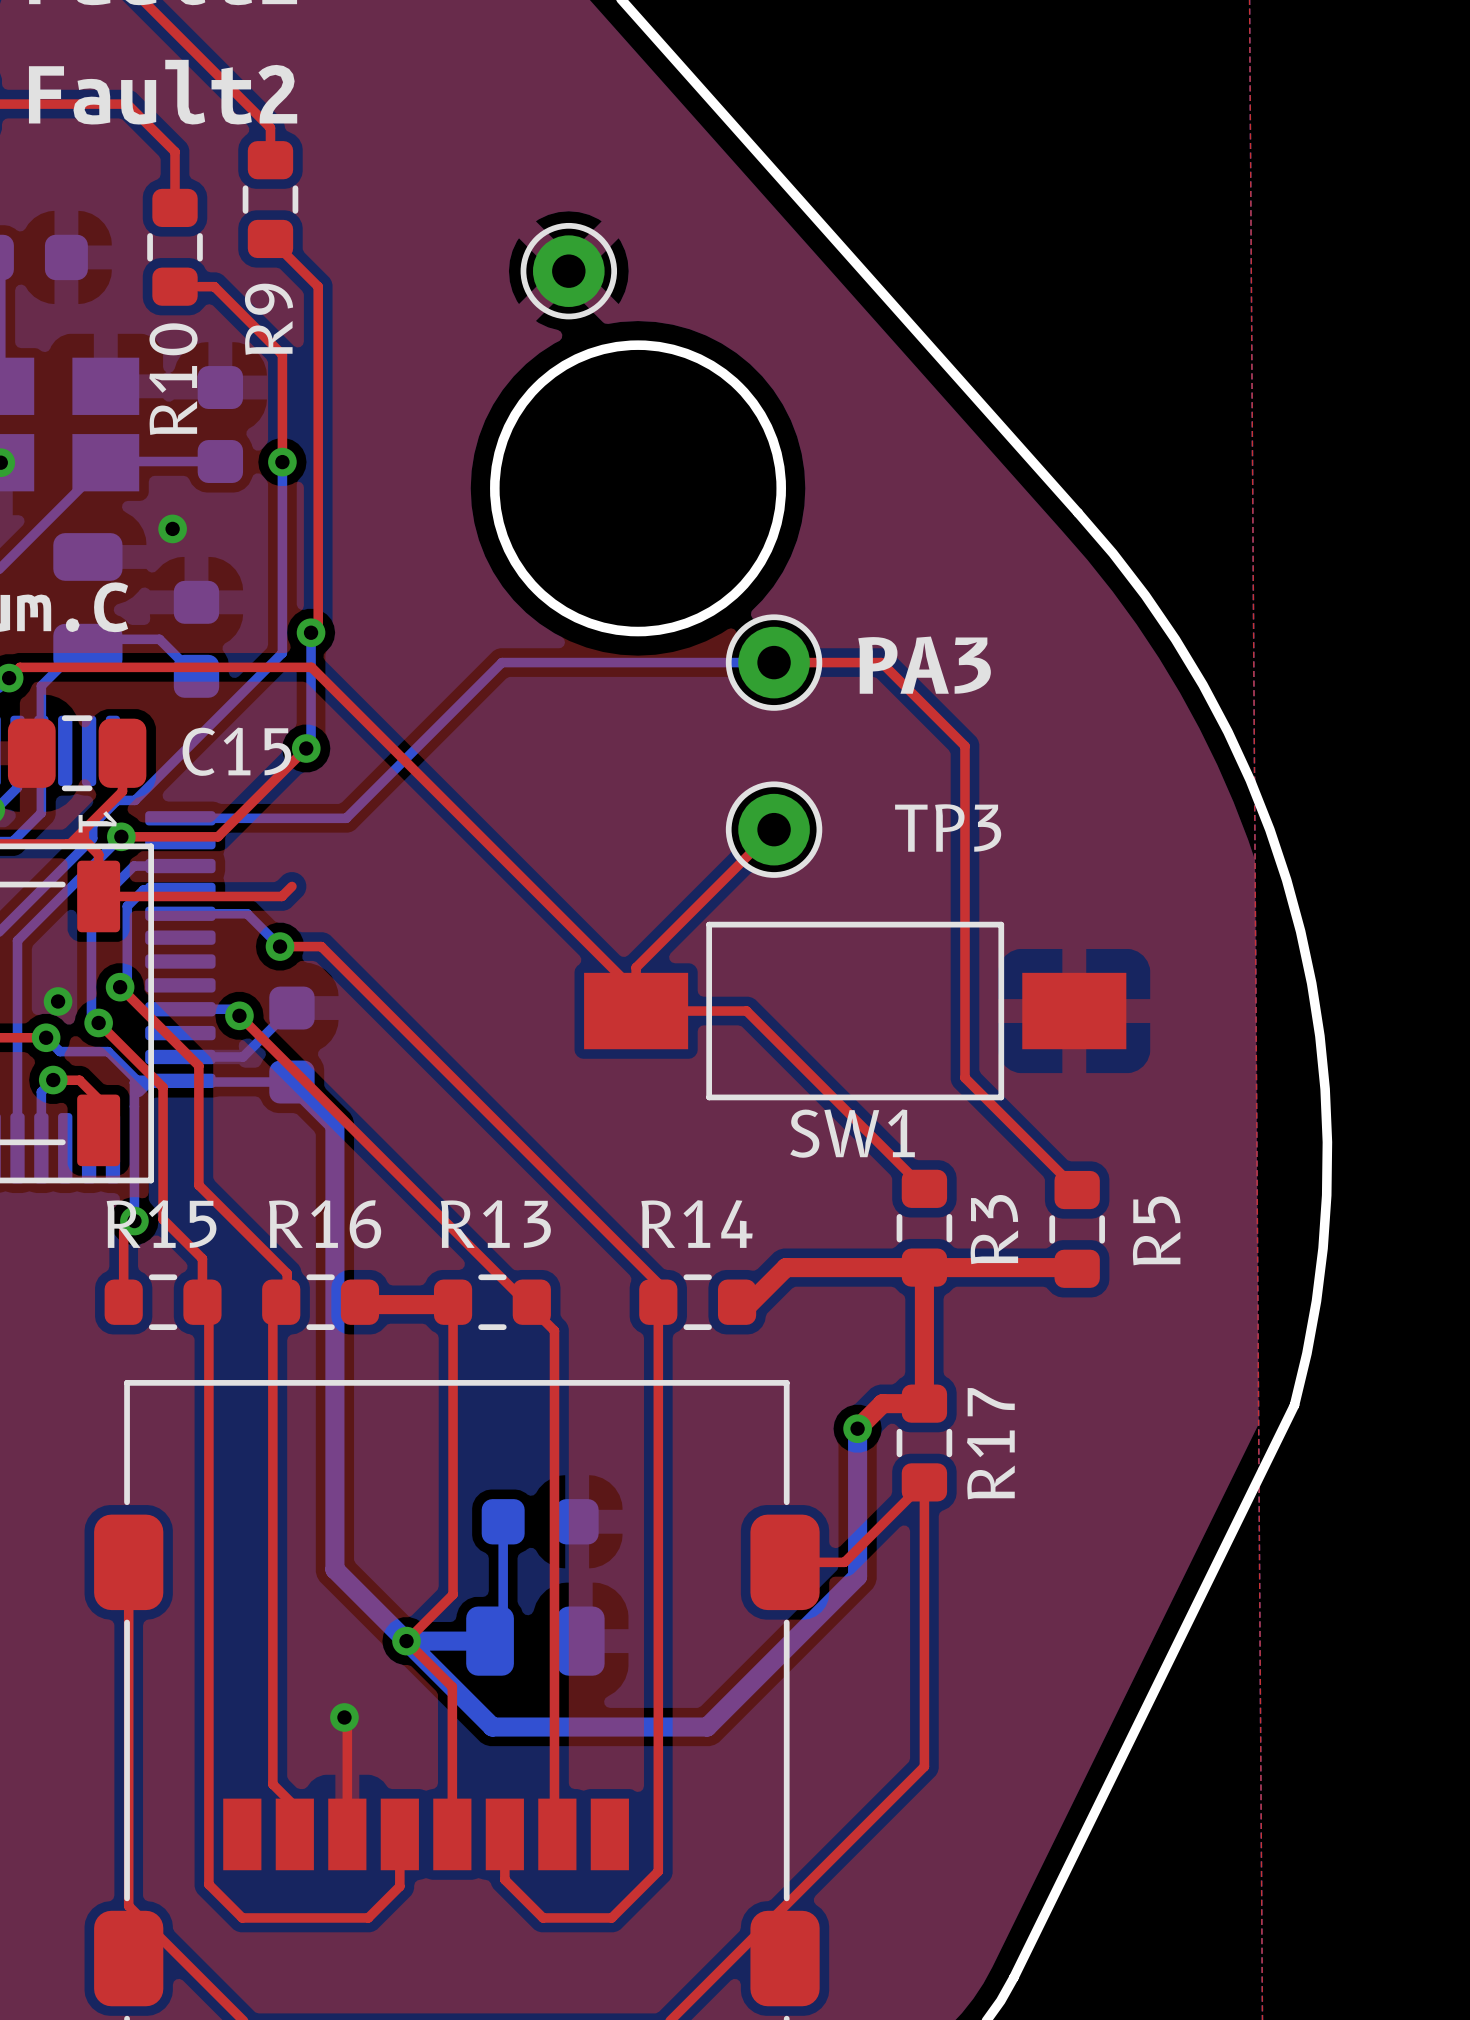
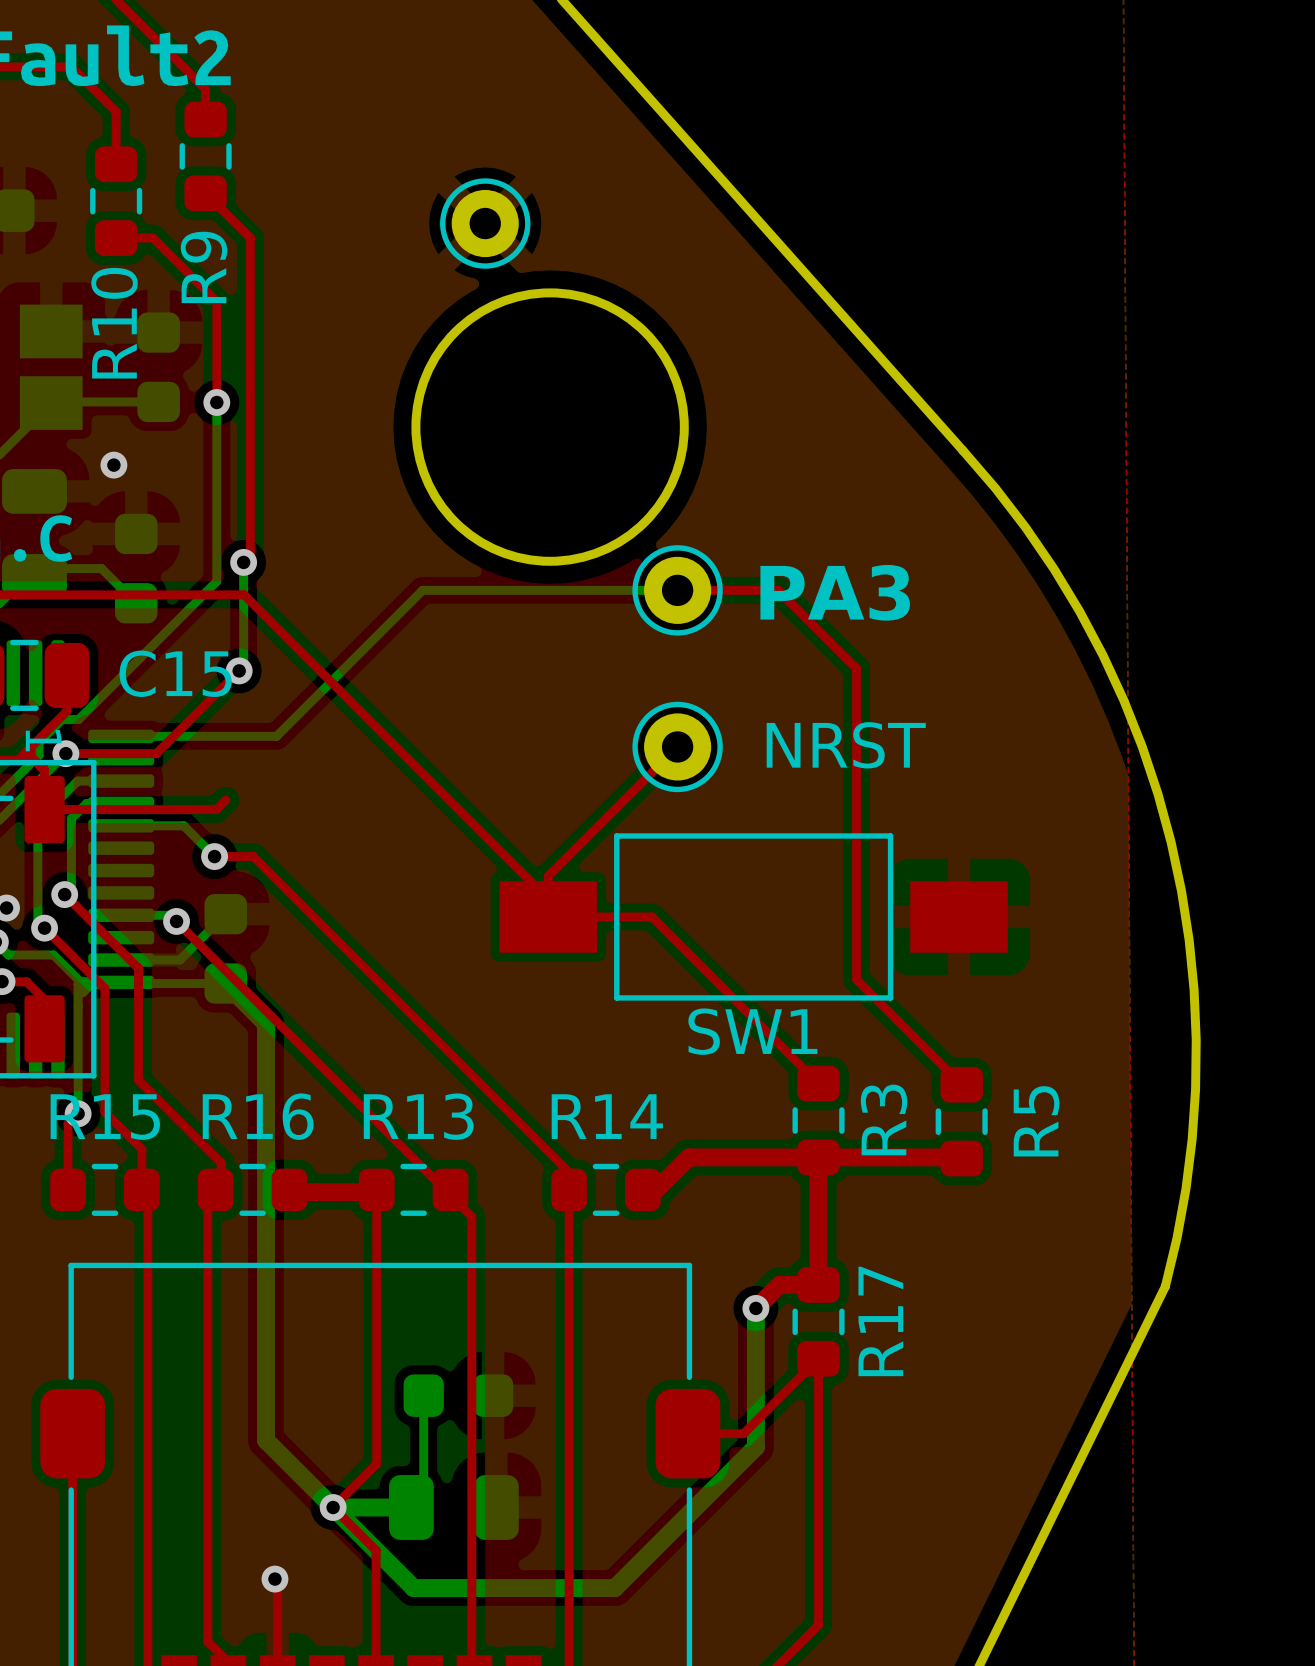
TP3 name: TP3 (948, 827) -> NRST (846, 745)

